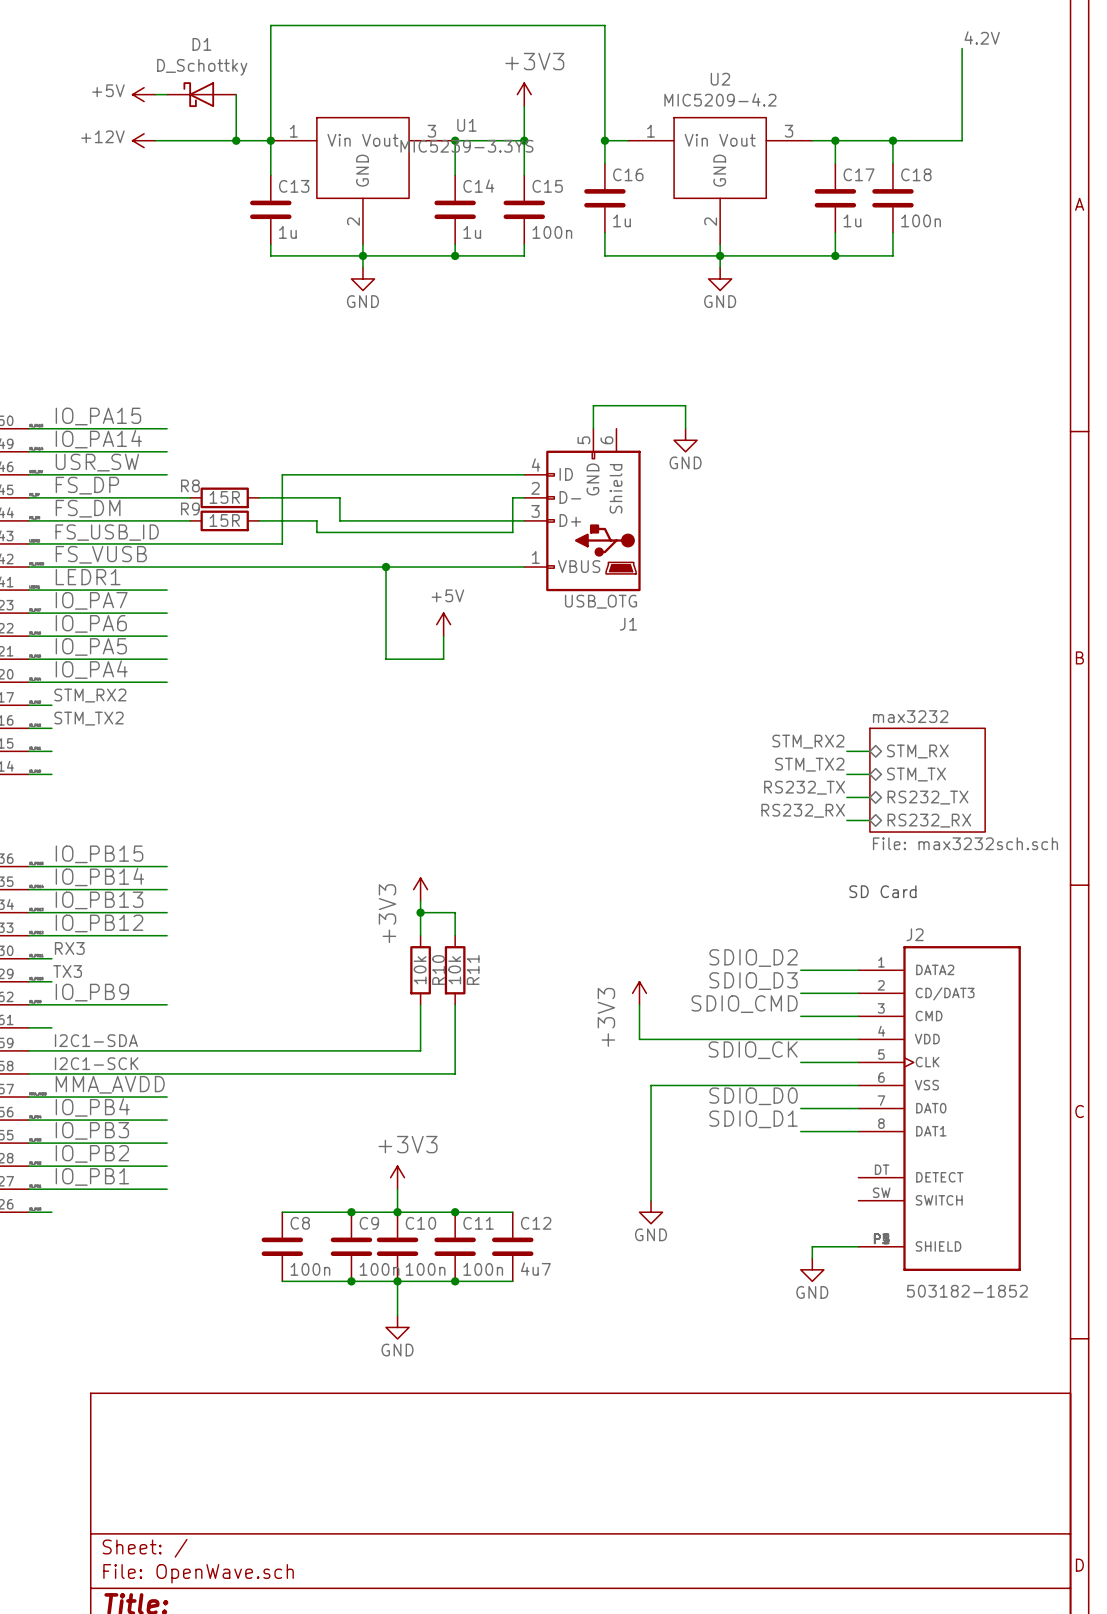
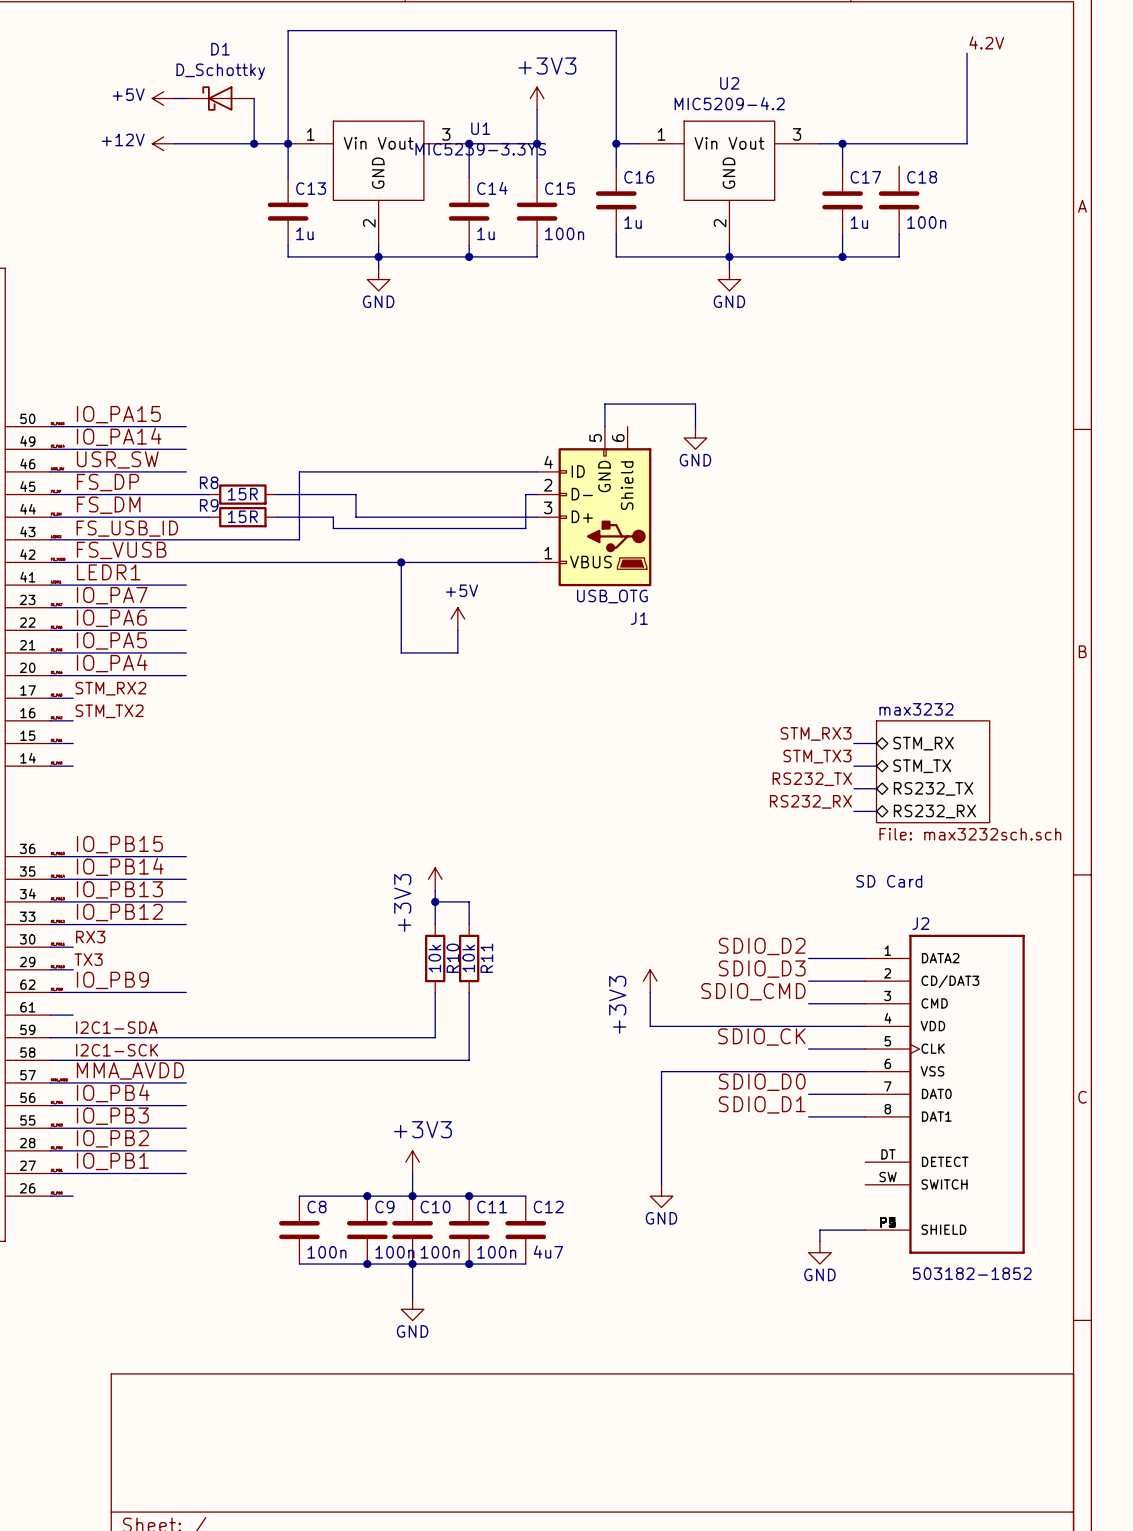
wire: (892, 140) (892, 163) -> none
junction: (892, 140) -> none
label: STM_RX2 (808, 741) -> STM_RX3 (816, 733)
label: STM_TX2 (809, 764) -> STM_TX3 (817, 756)

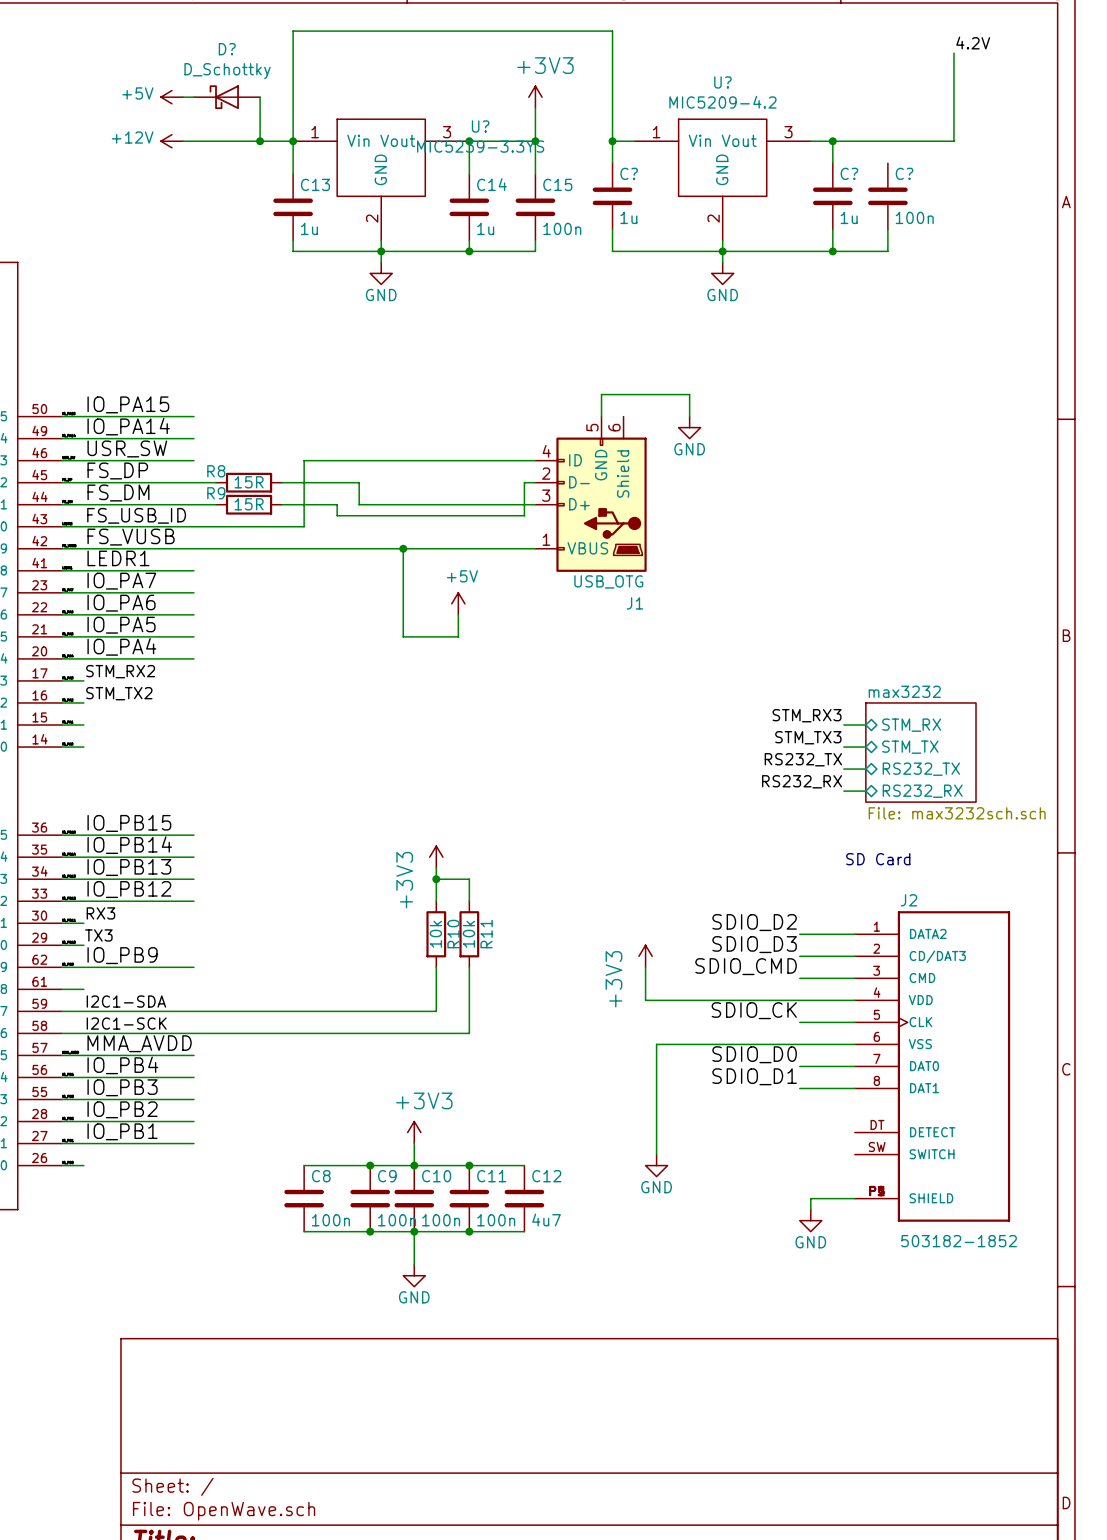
D1 name: D1 (220, 49) -> D? (227, 49)
U2 name: U2 (729, 83) -> U? (722, 82)
U1 name: U1 (480, 128) -> U? (480, 126)
C16 name: C16 (639, 177) -> C? (629, 173)
C17 name: C17 (865, 177) -> C? (849, 173)
C18 name: C18 (922, 177) -> C? (904, 173)

